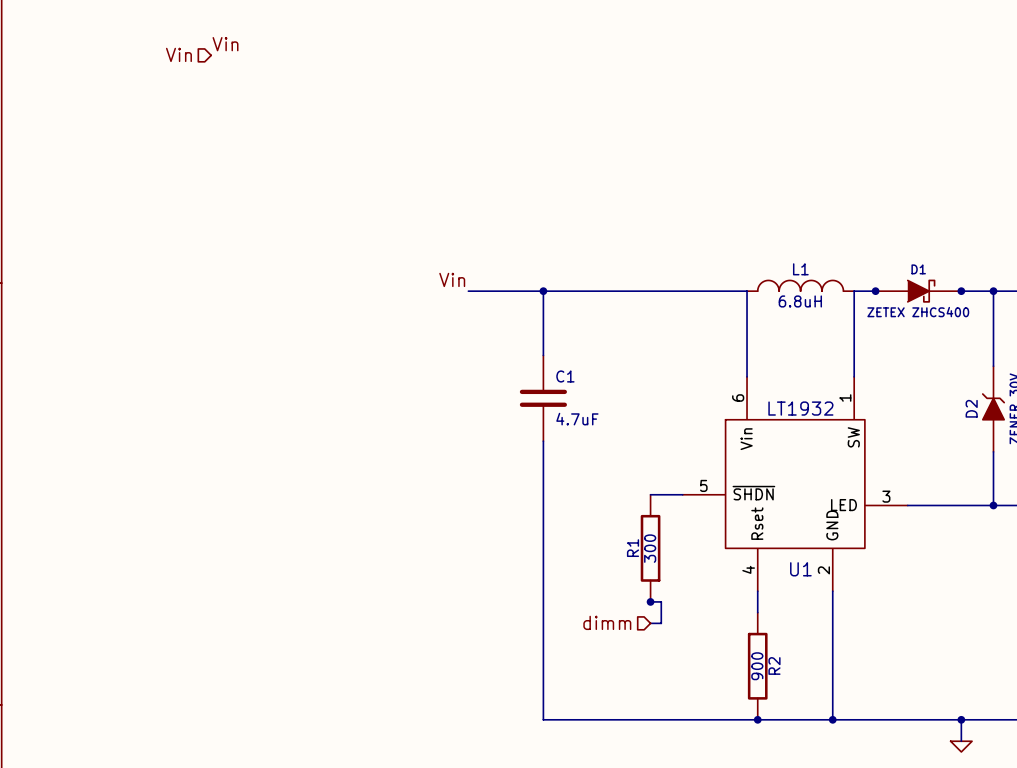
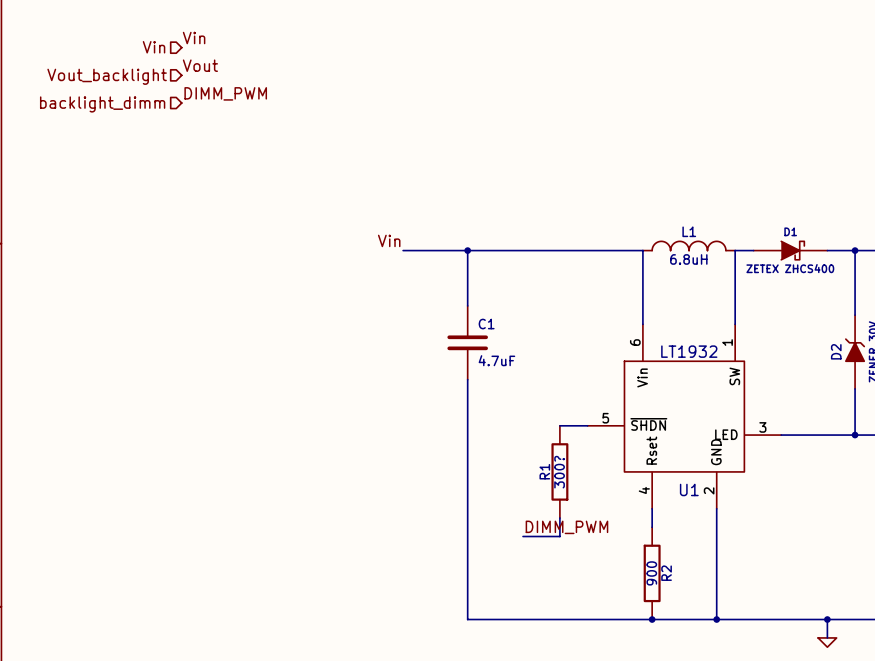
label: none -> Vout (200, 65)
hierarchical label: none -> Vout_backlight (107, 76)
label: none -> DIMM_PWM (225, 93)
hierarchical label: none -> backlight_dimm (102, 104)
junction: (875, 291) -> none
junction: (961, 291) -> none
R1 value: 300 (650, 548) -> 300? (559, 472)
wire: (650, 601) (661, 601) (661, 623) (650, 623) -> (559, 518) (559, 536) (523, 536)
junction: (650, 601) -> none
label: none -> DIMM_PWM (566, 527)
hierarchical label: dimm (607, 622) -> none

